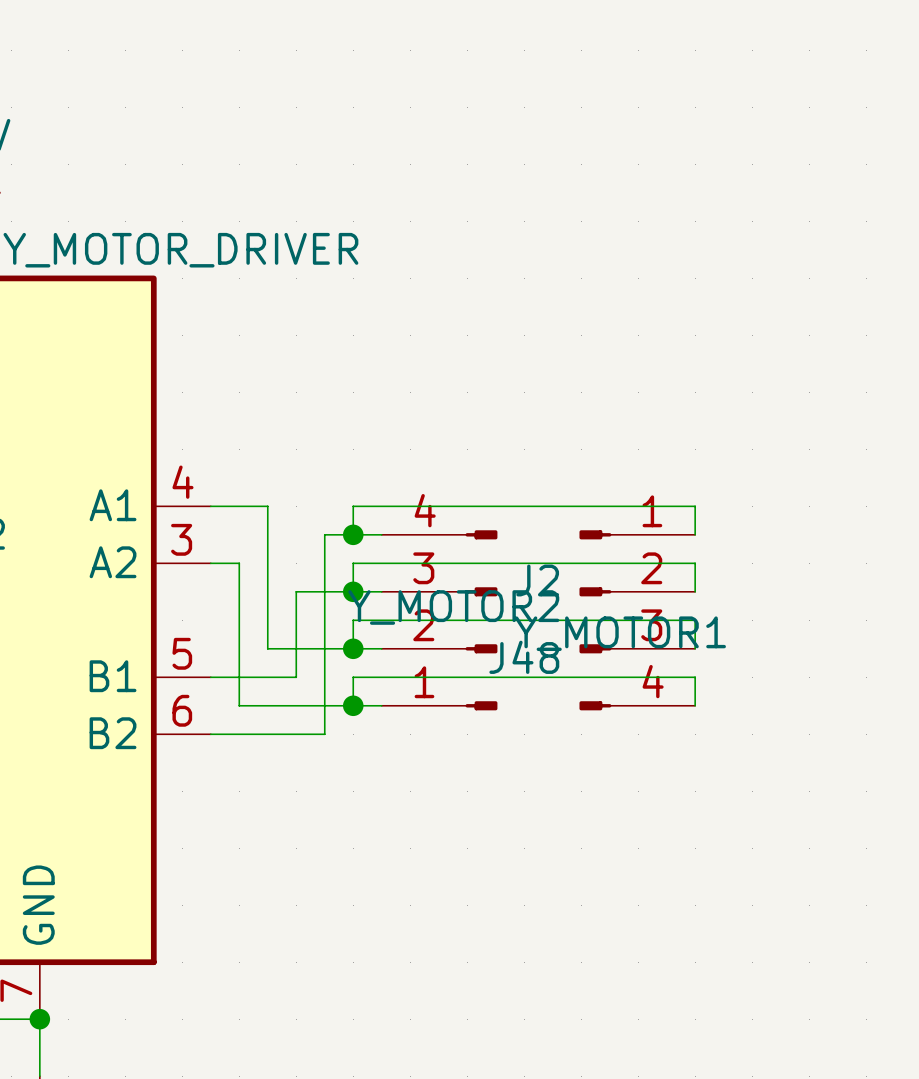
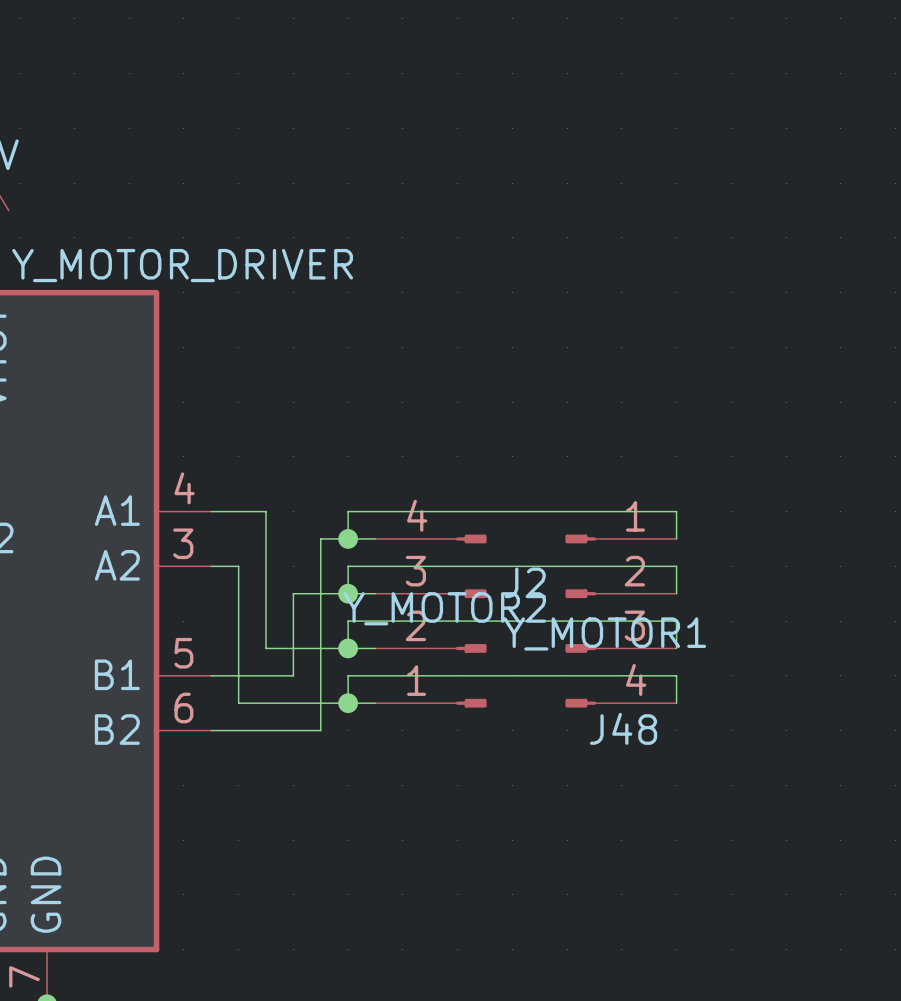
J48 name position: J48 (524, 657) -> J48 (623, 728)

